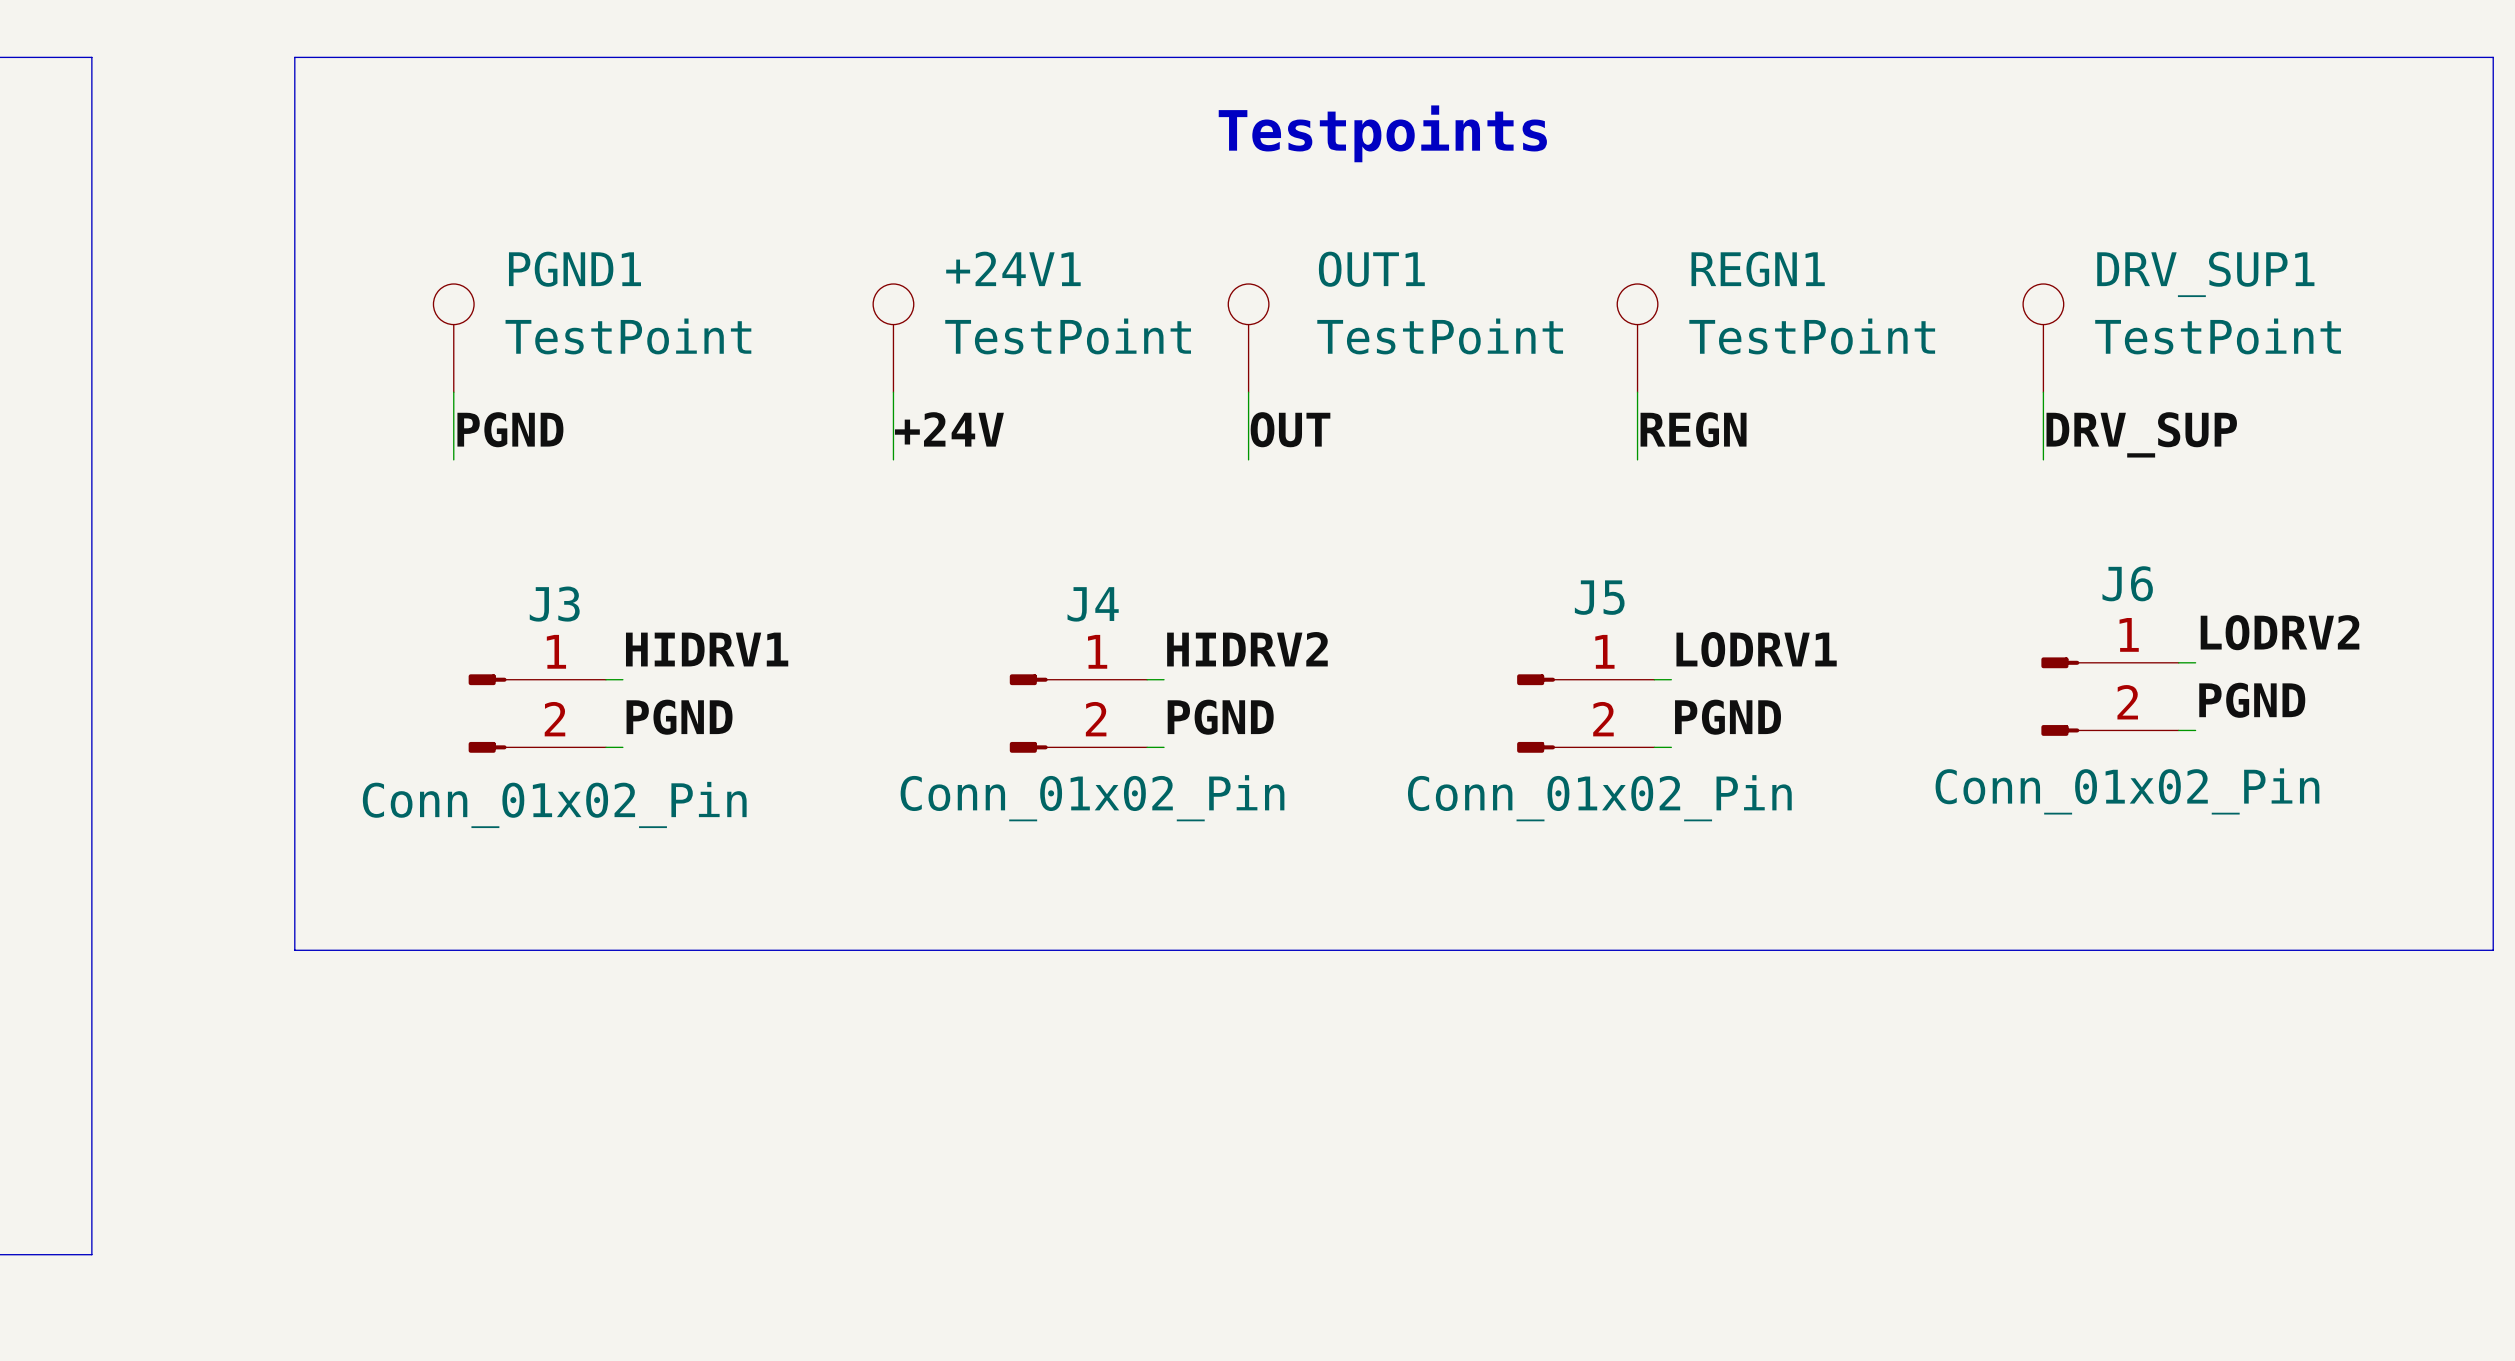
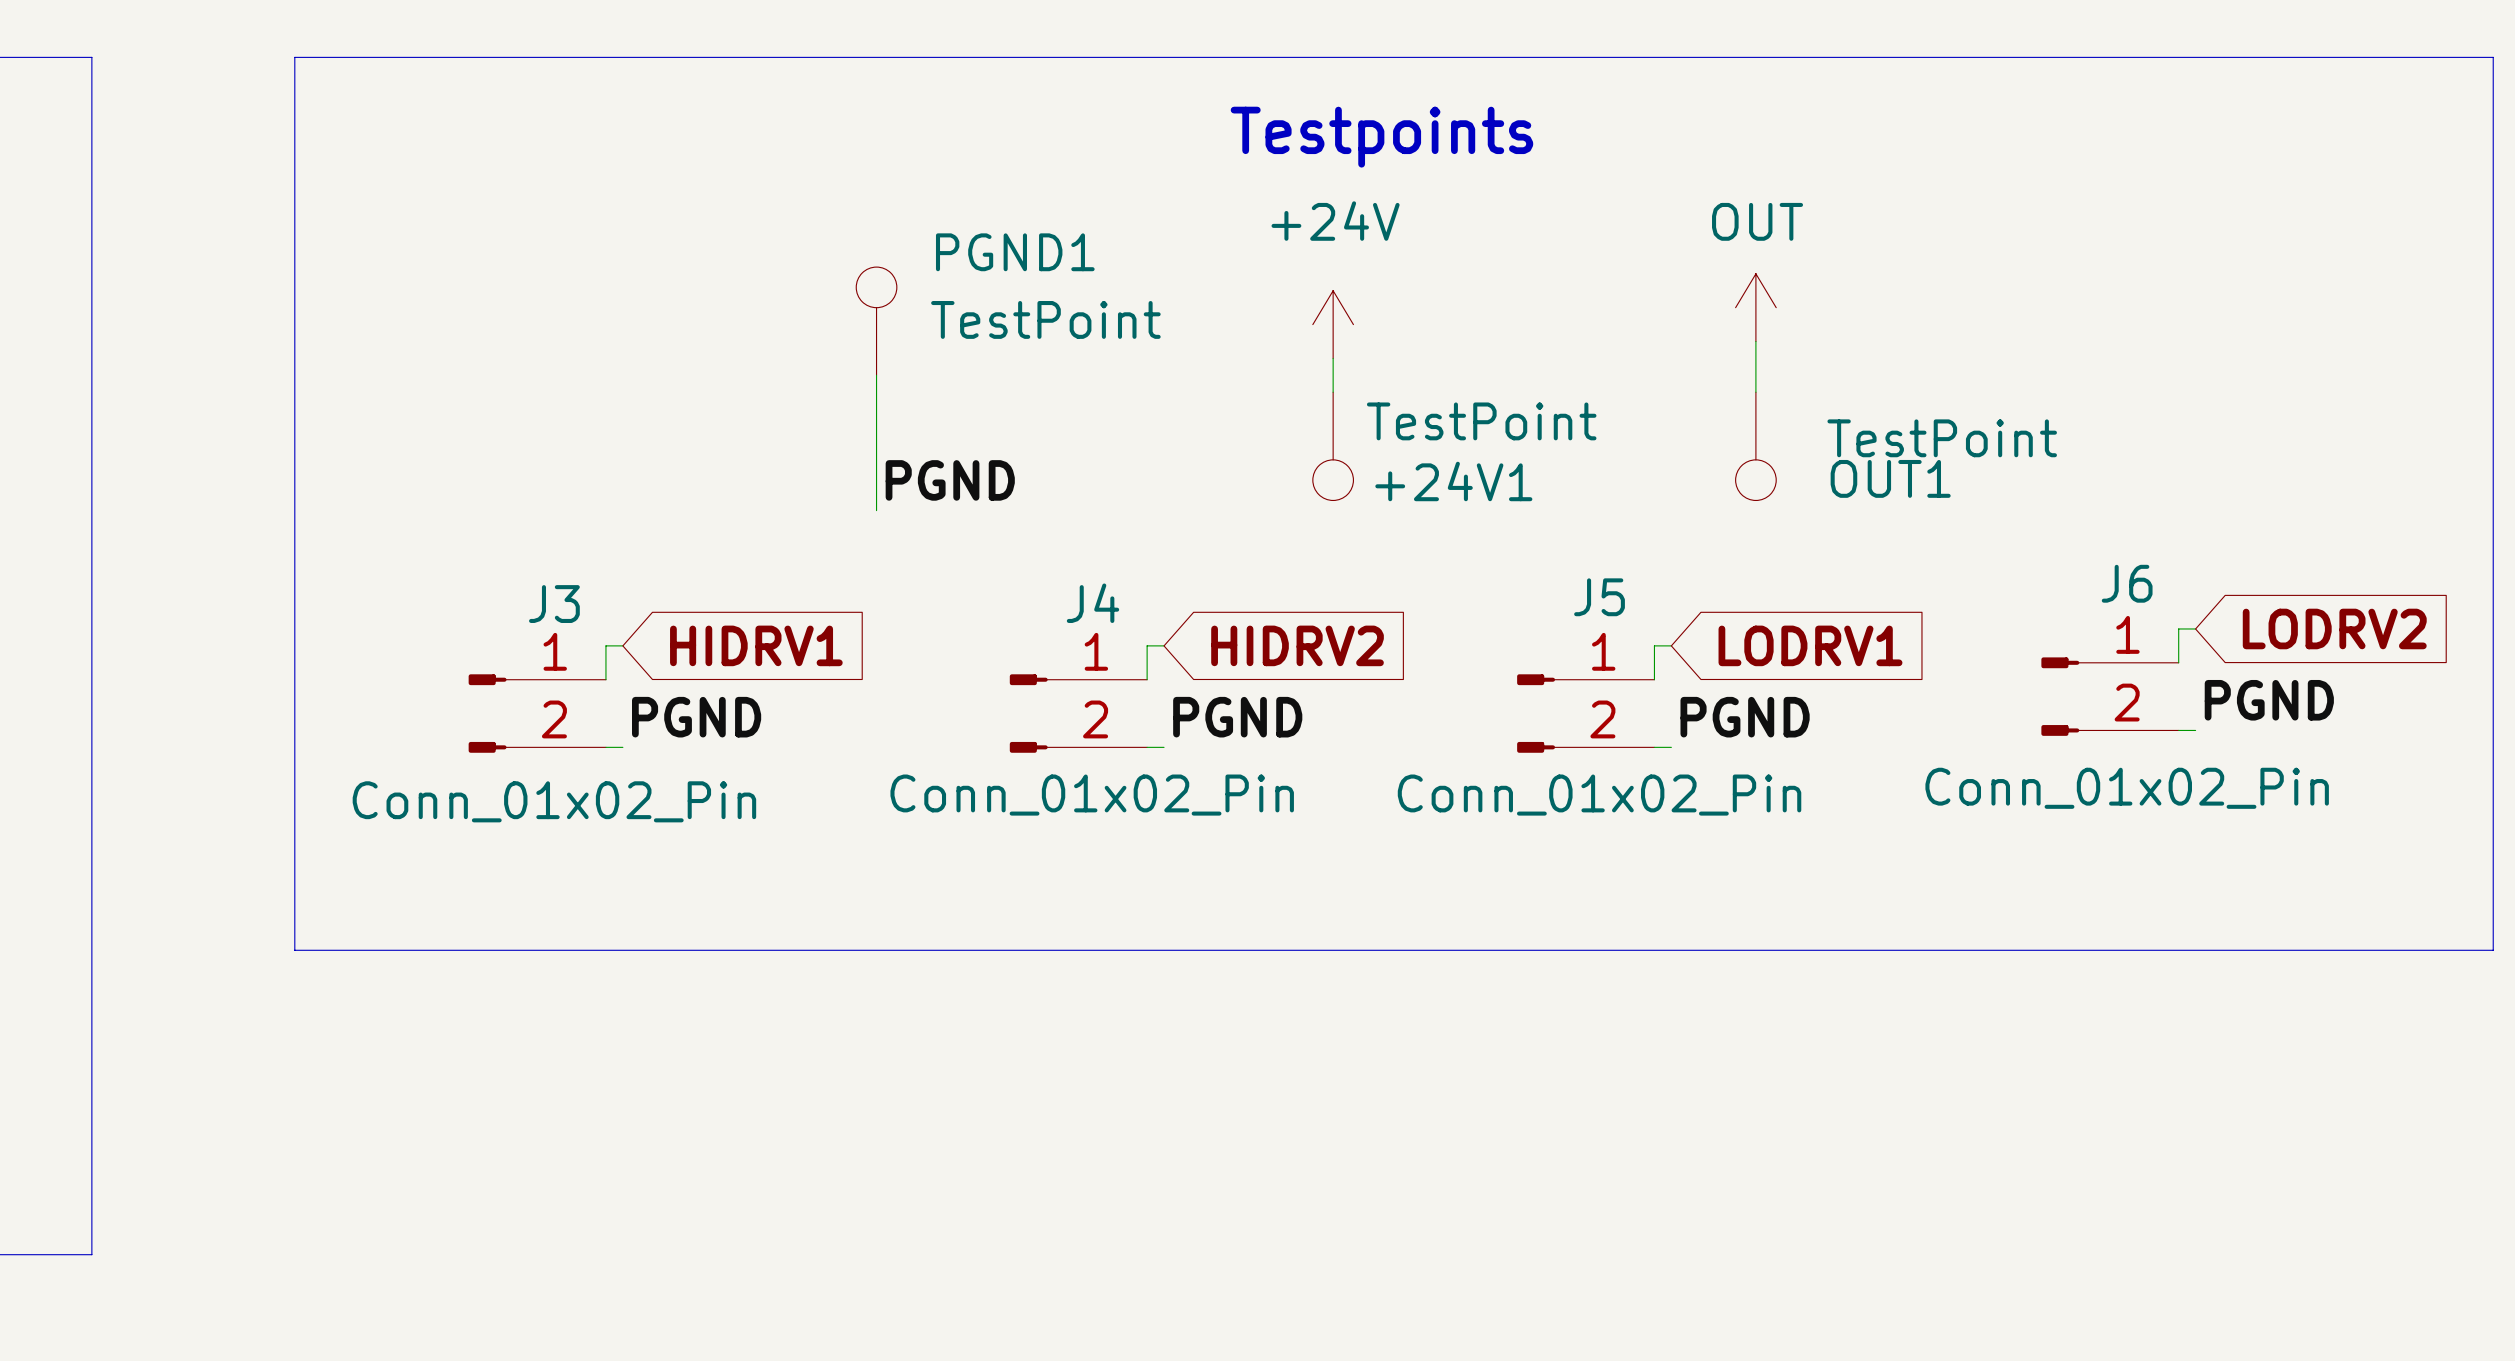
+24V1 name position: +24V1 (1013, 268) -> +24V1 (1453, 481)
OUT1 name position: OUT1 (1371, 269) -> OUT1 (1890, 478)
+24V1 rotation: 0° (893, 304) -> 180° (1333, 480)
OUT1 rotation: 0° (1248, 304) -> 180° (1755, 480)
power symbol: none -> OUT (1755, 307)
power symbol: none -> +24V (1333, 324)
+24V1 value position: TestPoint (1068, 336) -> TestPoint (1481, 421)
PGND1 position: (453, 338) -> (876, 321)
+24V1 position: (893, 338) -> (1333, 446)
OUT1 position: (1248, 338) -> (1755, 446)
REGN1: TestPoint (1637, 338) -> none
DRV_SUP1: TestPoint (2043, 338) -> none
wire: none -> (1755, 341) (1755, 392)
wire: none -> (1333, 358) (1333, 392)
wire: none -> (876, 375) (876, 510)
wire: (453, 392) (453, 459) -> none
wire: (893, 392) (893, 459) -> none
wire: (1248, 392) (1248, 459) -> none
wire: (1637, 392) (1637, 459) -> none
wire: (2043, 392) (2043, 459) -> none
label position: PGND (510, 429) -> PGND (950, 480)
label: +24V (949, 429) -> none
label: OUT (1290, 429) -> none
label: REGN (1693, 429) -> none
label: DRV_SUP (2141, 434) -> none
global label: none -> LODRV2 (2334, 628)
label: LODRV2 (2280, 632) -> none
global label: none -> HIDRV1 (756, 645)
global label: none -> HIDRV2 (1297, 645)
global label: none -> LODRV1 (1810, 645)
label: HIDRV1 (707, 649) -> none
label: HIDRV2 (1247, 649) -> none
label: LODRV1 (1756, 649) -> none
wire: (2178, 662) (2195, 662) -> (2178, 662) (2178, 628) (2195, 628)
wire: (605, 679) (622, 679) -> (605, 679) (605, 645) (622, 645)
wire: (1147, 679) (1164, 679) -> (1147, 679) (1147, 645) (1164, 645)
wire: (1654, 679) (1671, 679) -> (1654, 679) (1654, 645) (1671, 645)

